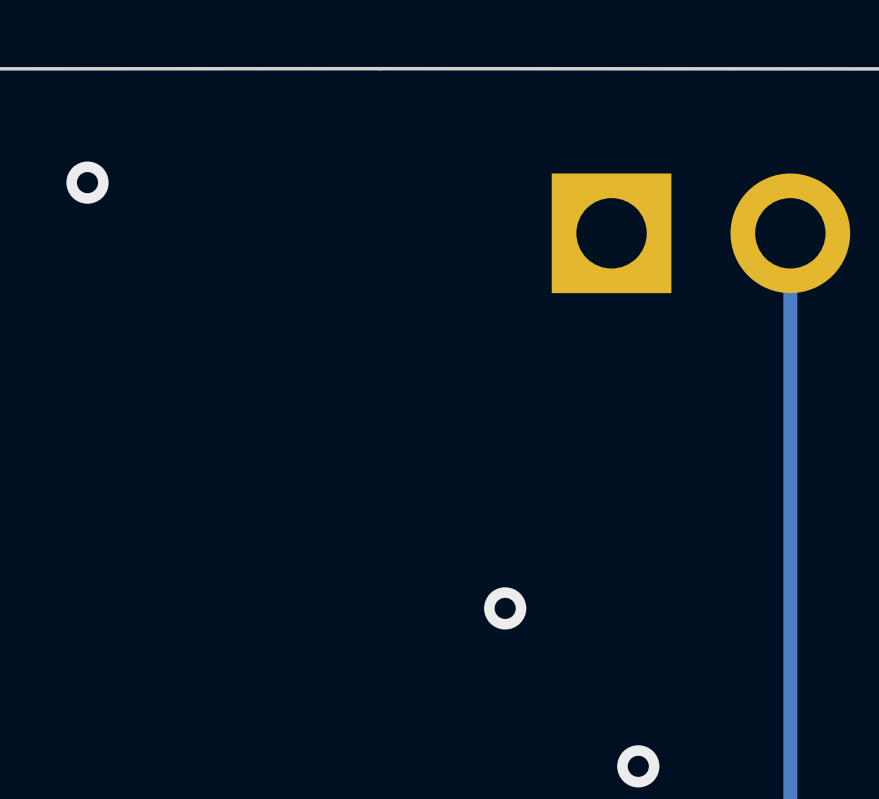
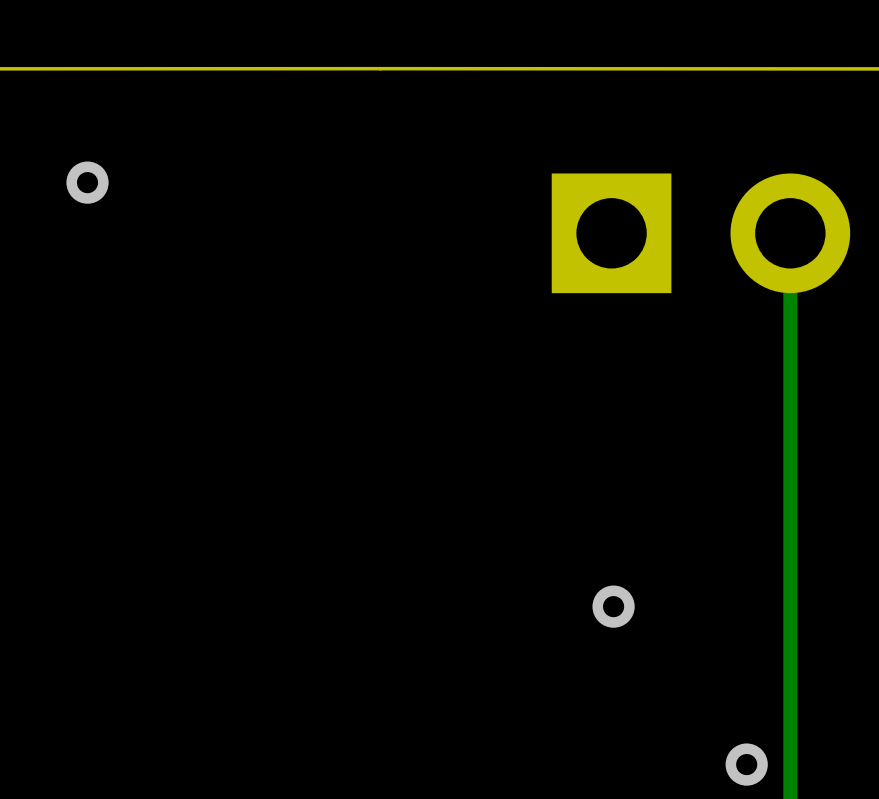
via: none -> (613, 606)
via: (505, 608) -> none
via: none -> (746, 764)
via: (638, 766) -> none

